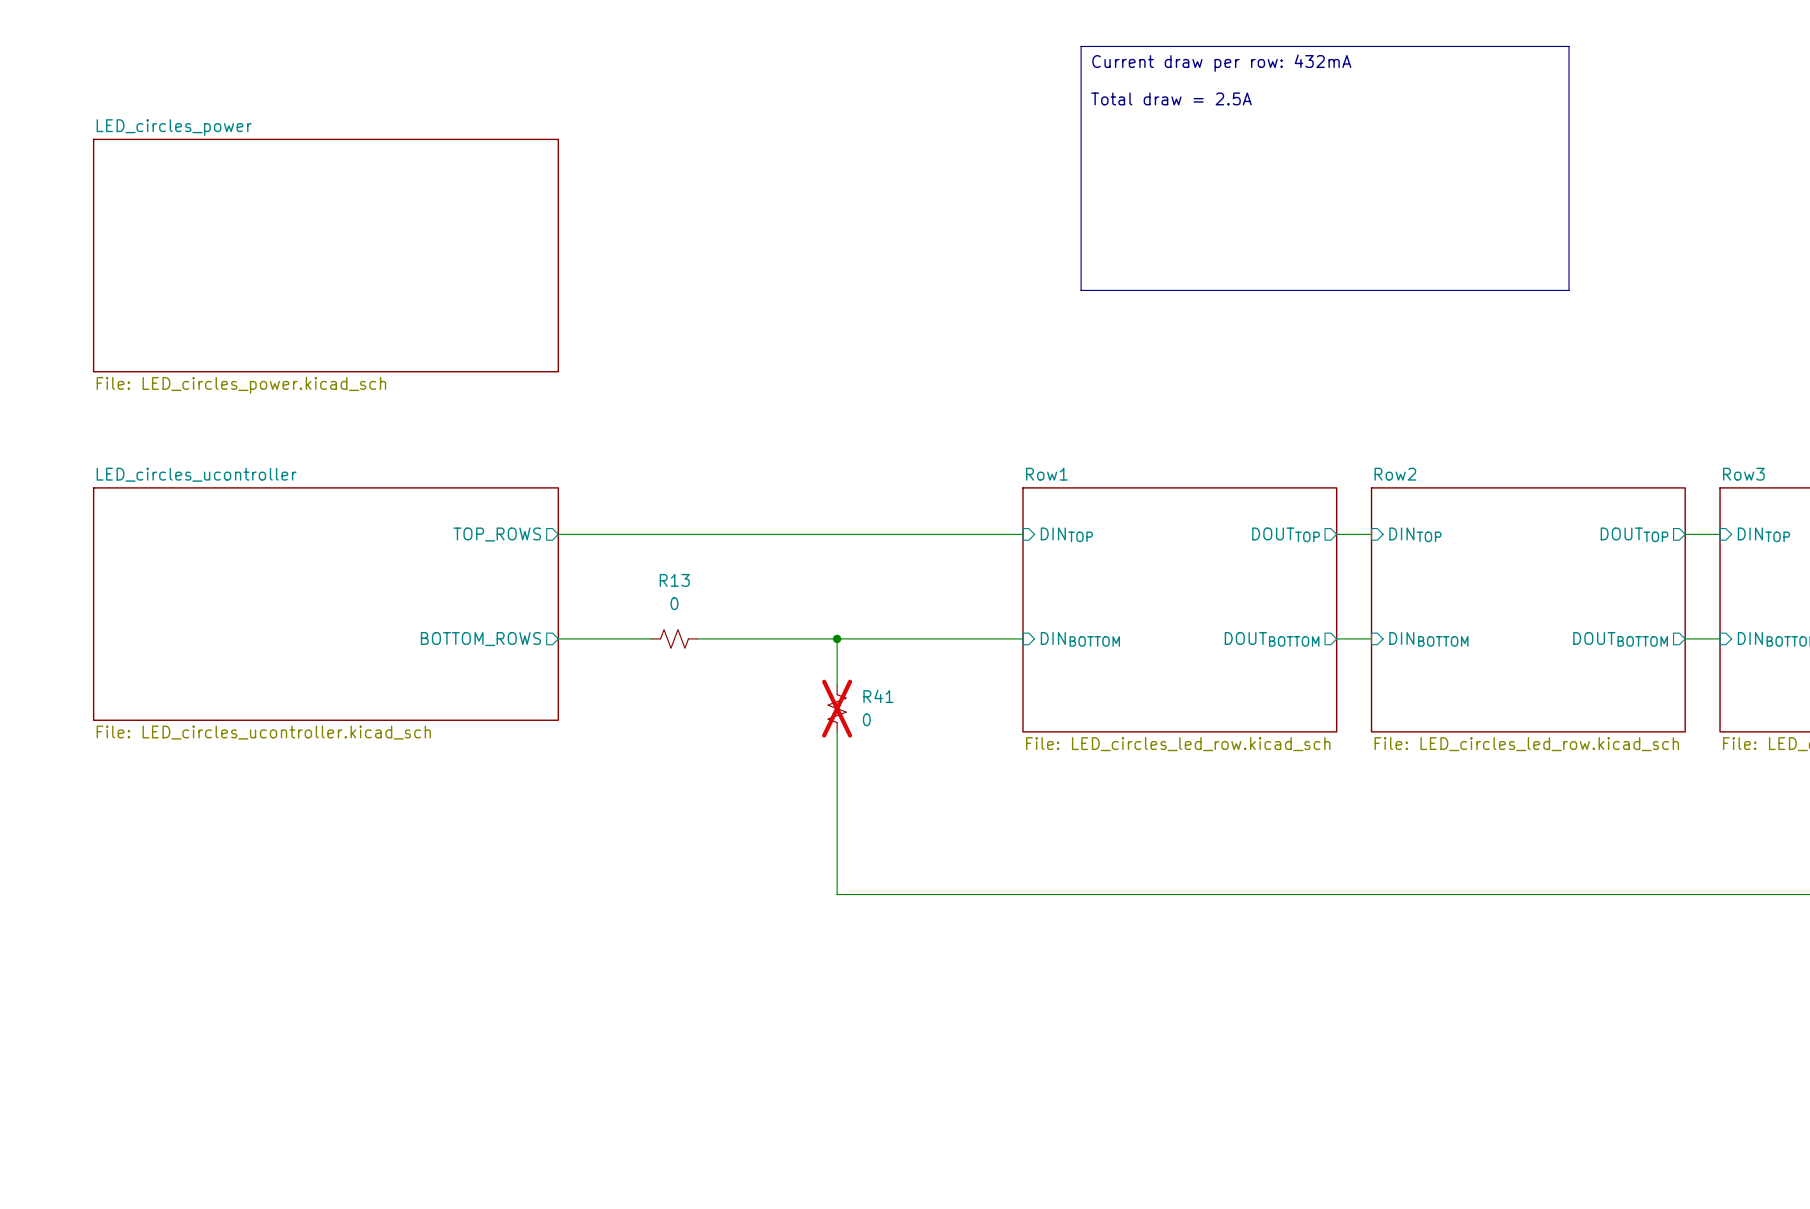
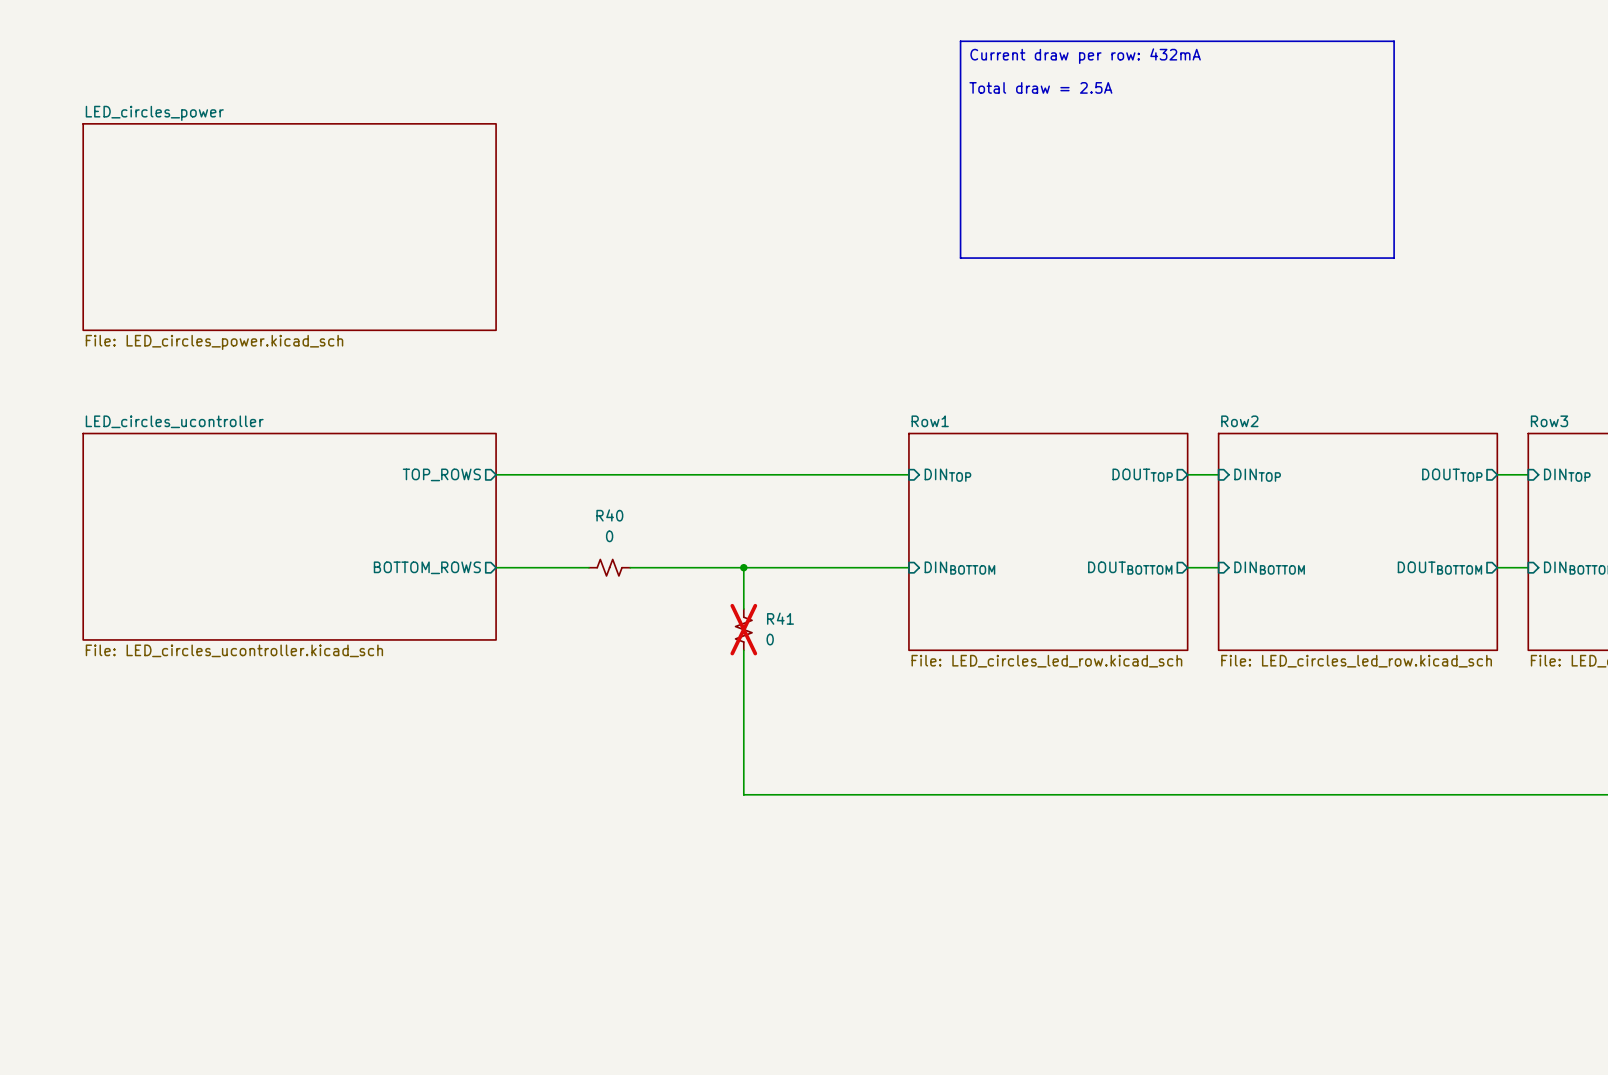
R13: 0 (674, 638) -> none
R40: none -> 0 (609, 567)

